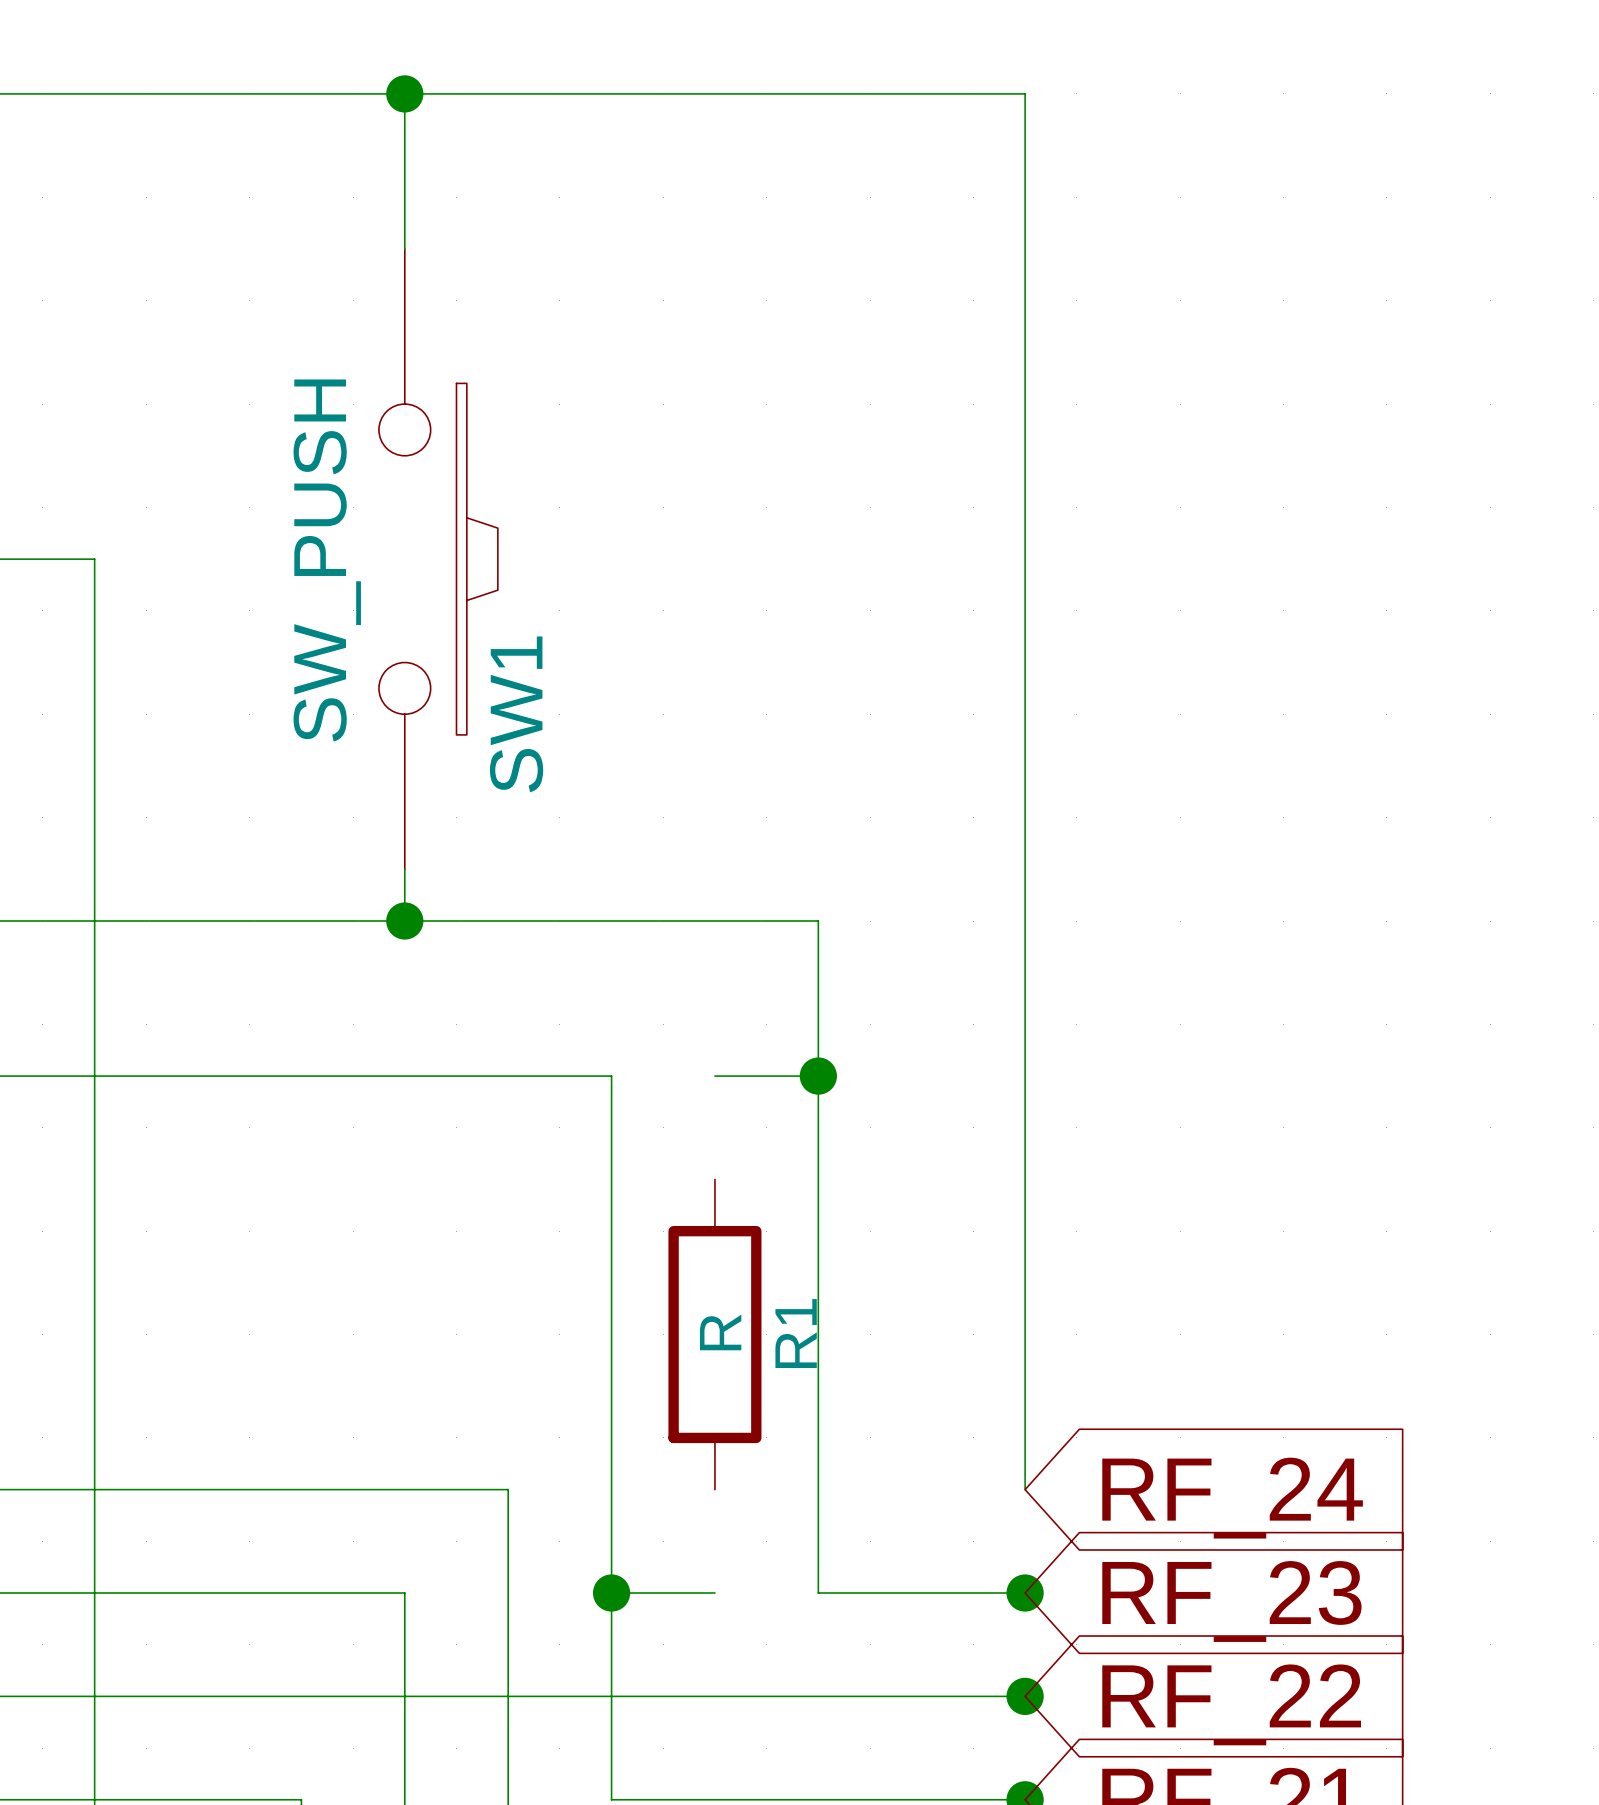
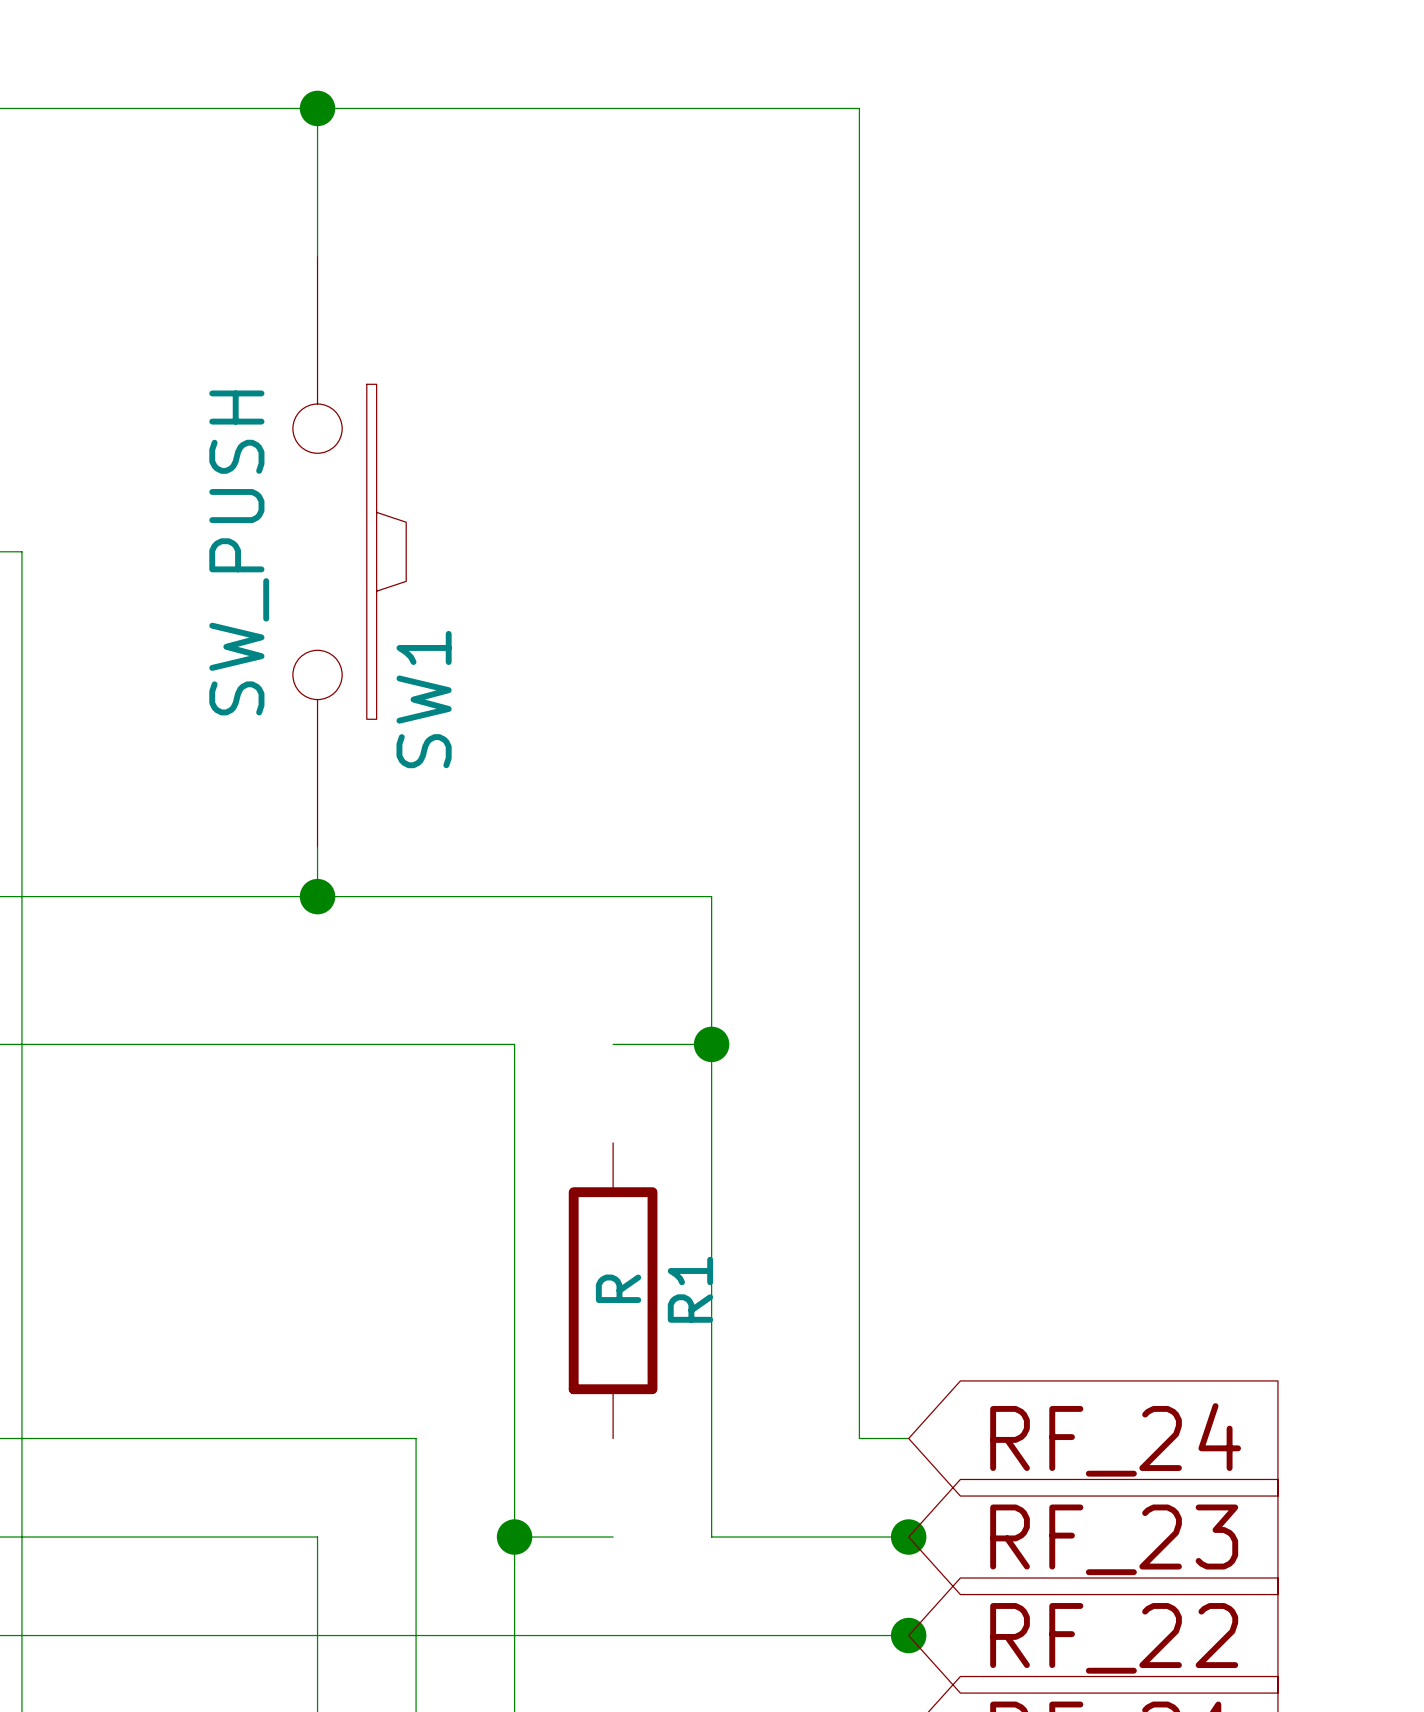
wire: (973, 93) (1025, 93) (1025, 1489) -> (859, 108) (859, 1438) (908, 1438)

